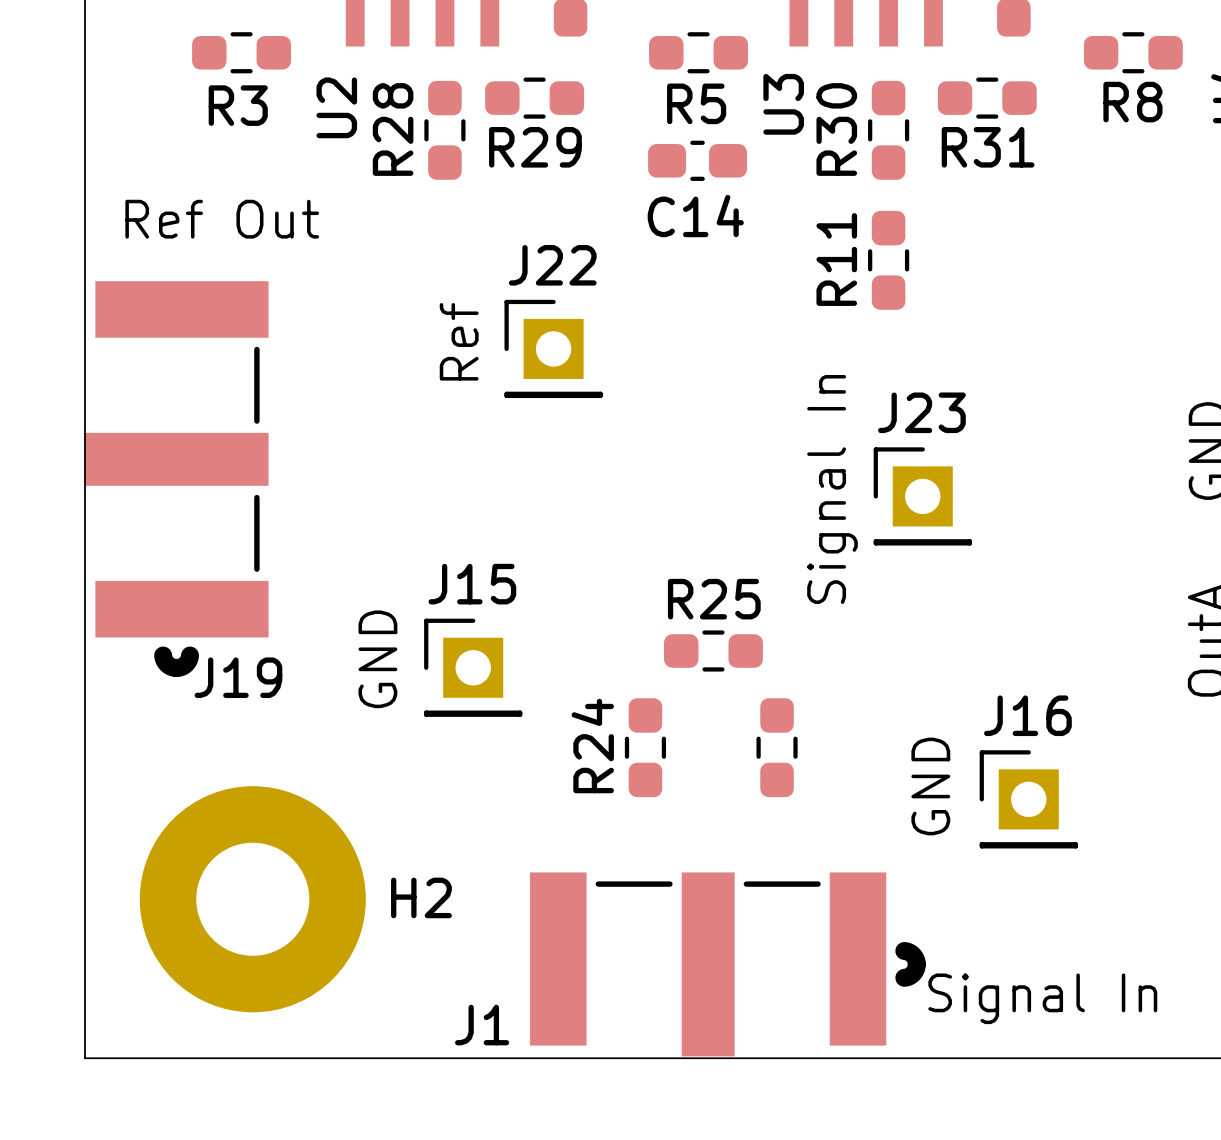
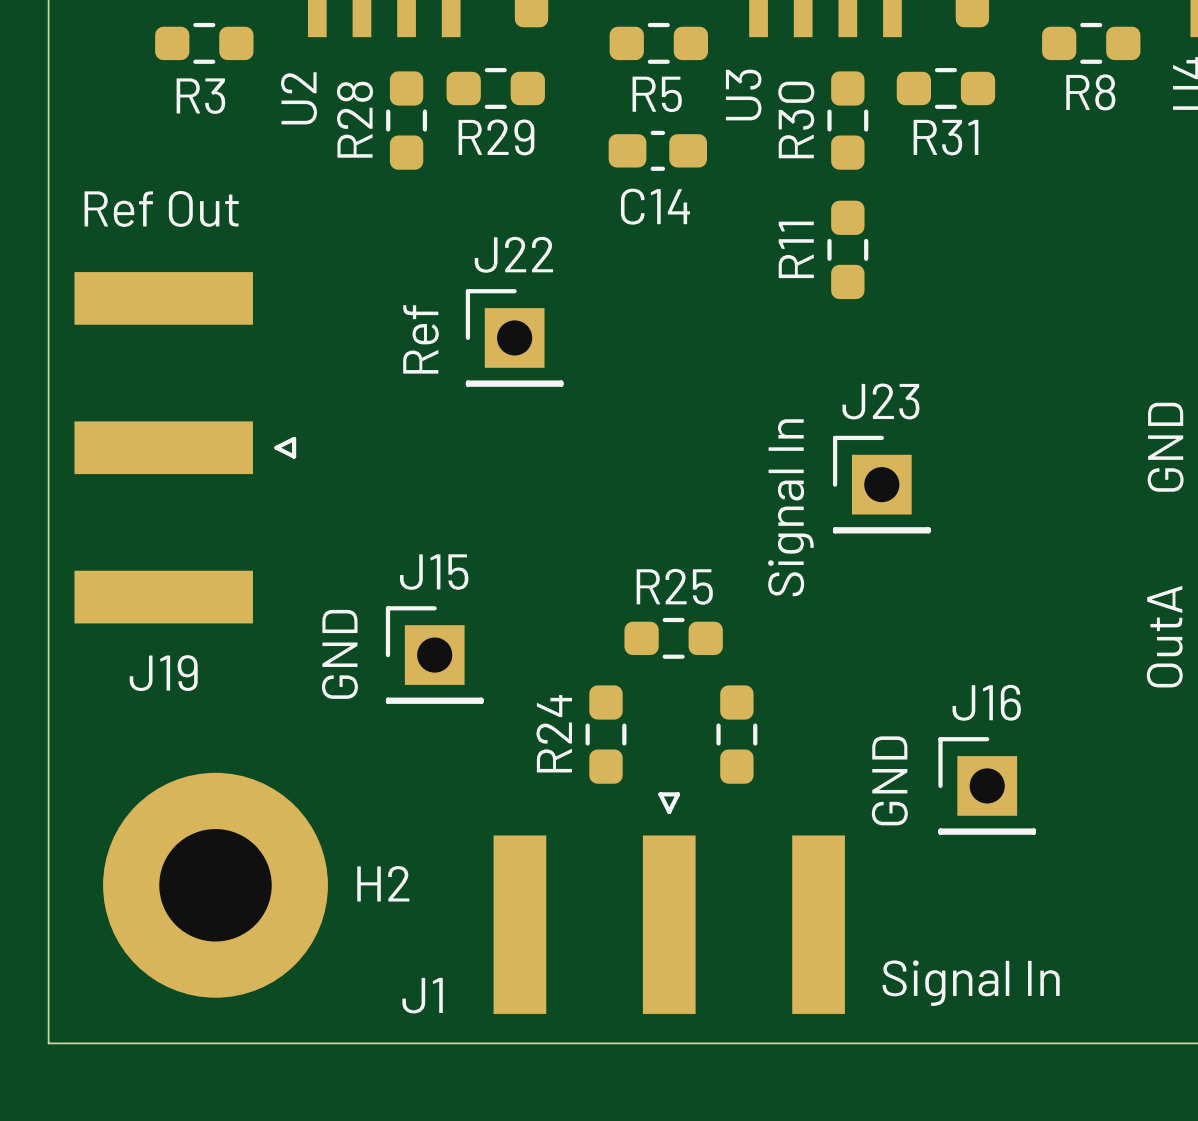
J19 footprint: [84, 281, 269, 677] -> [74, 272, 297, 624]
J19 name position: J19 (238, 677) -> J19 (163, 673)
J1 footprint: [530, 872, 926, 1057] -> [493, 792, 845, 1014]

